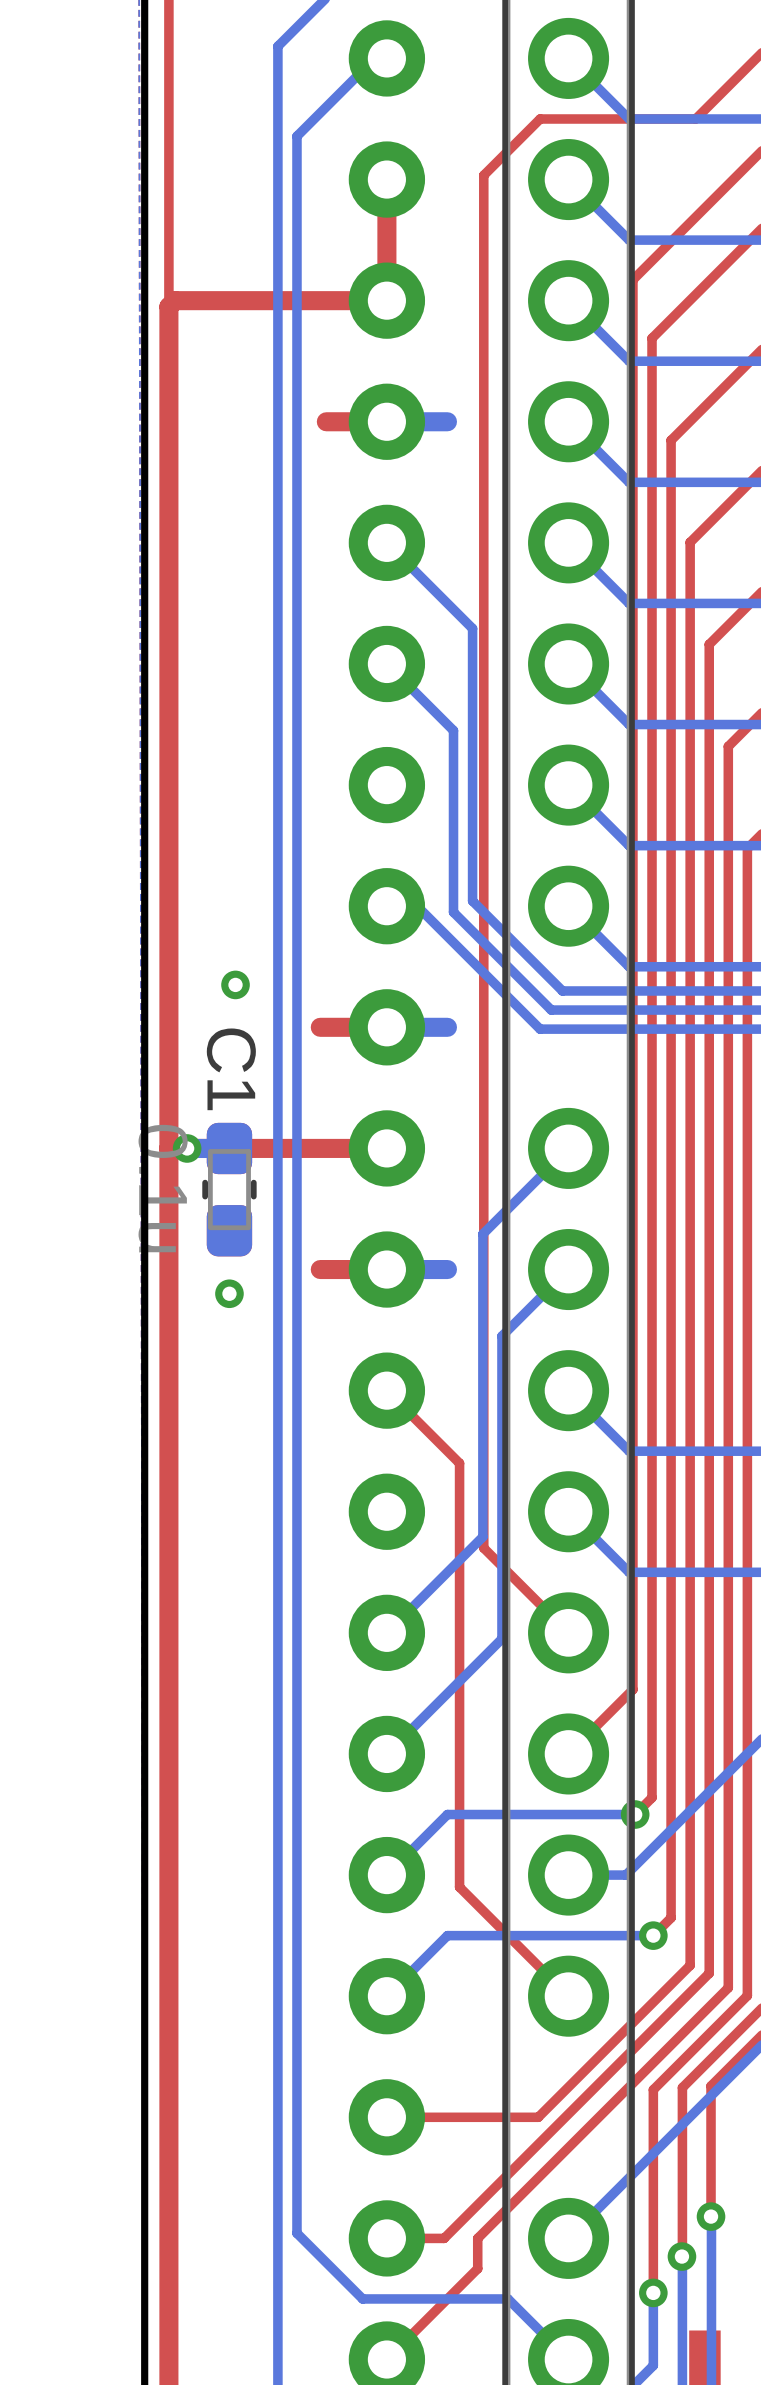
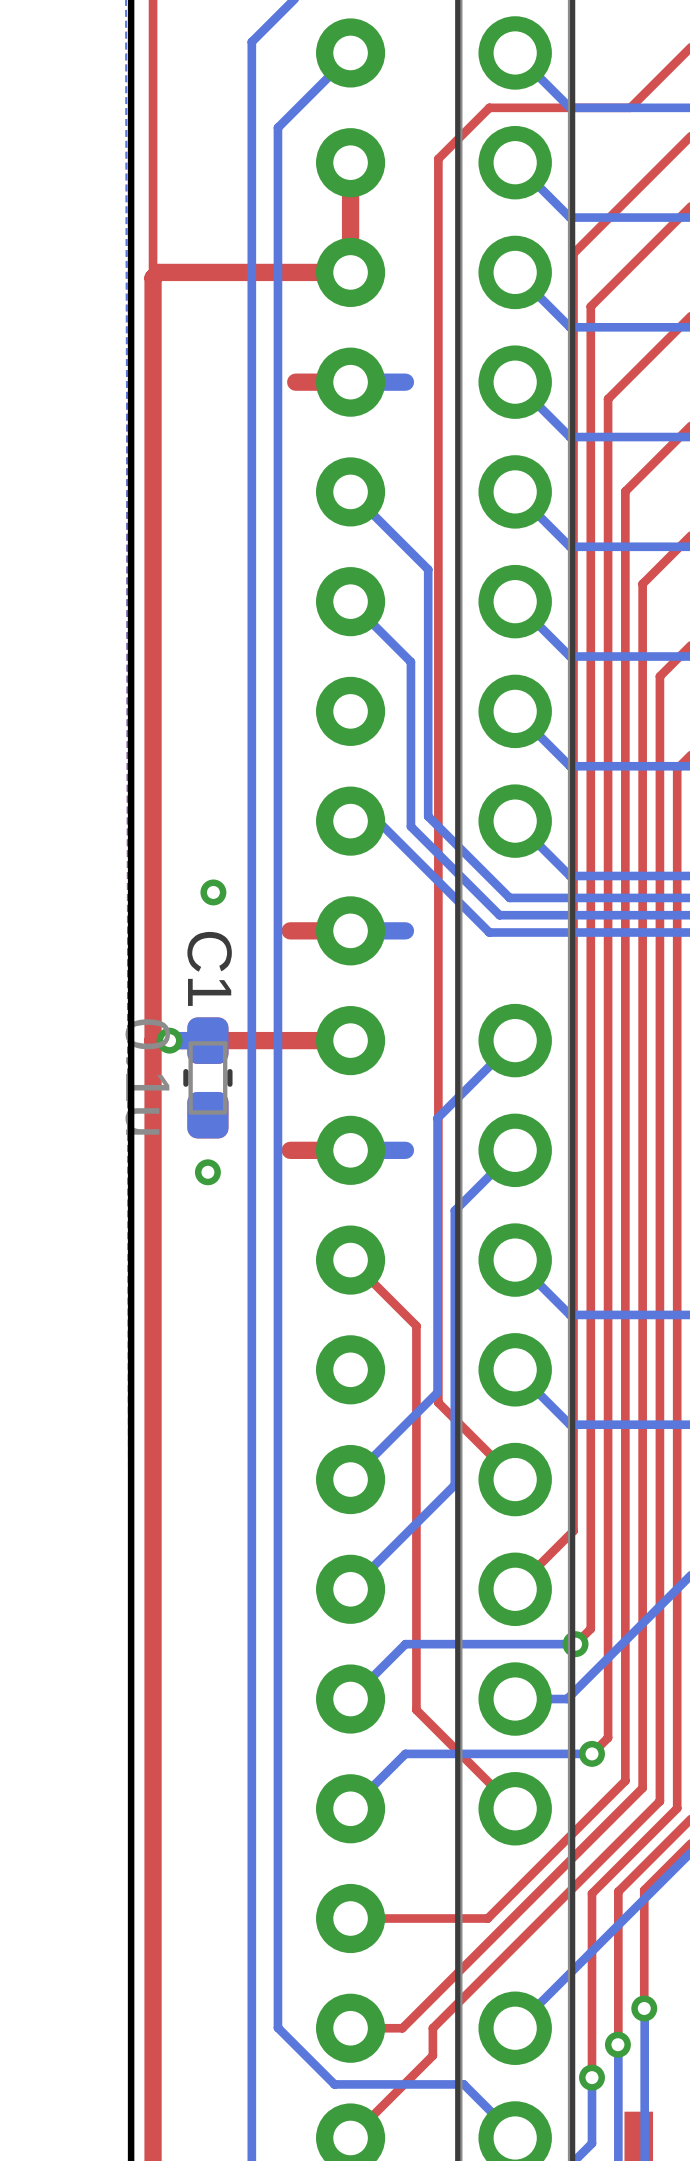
bottom track: (386, 58) (374, 58) (296, 136) (296, 2233) (362, 2298) (508, 2298) (568, 2359) -> none
bottom track: none -> (350, 55) (277, 127) (277, 2027) (334, 2084) (463, 2084) (515, 2135)

